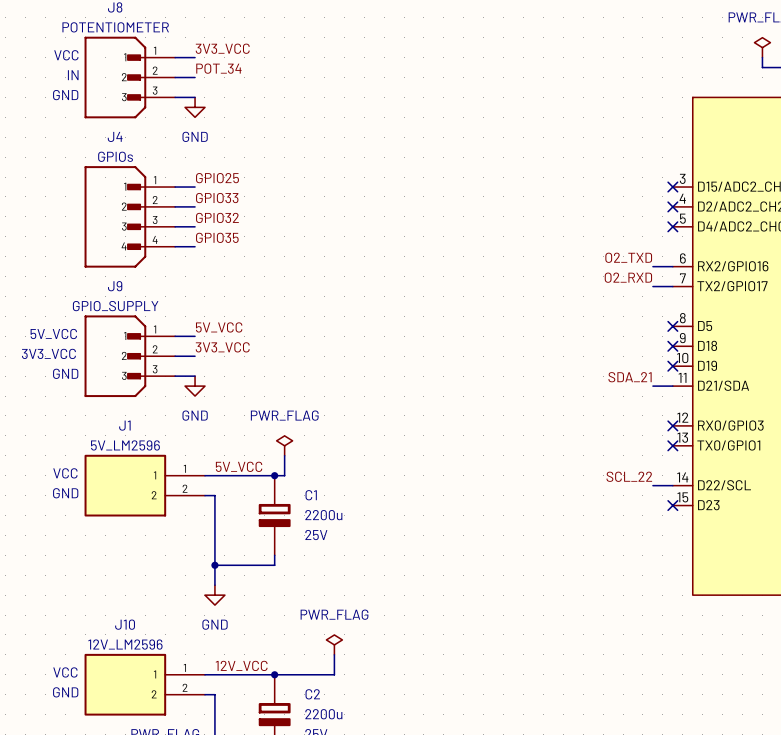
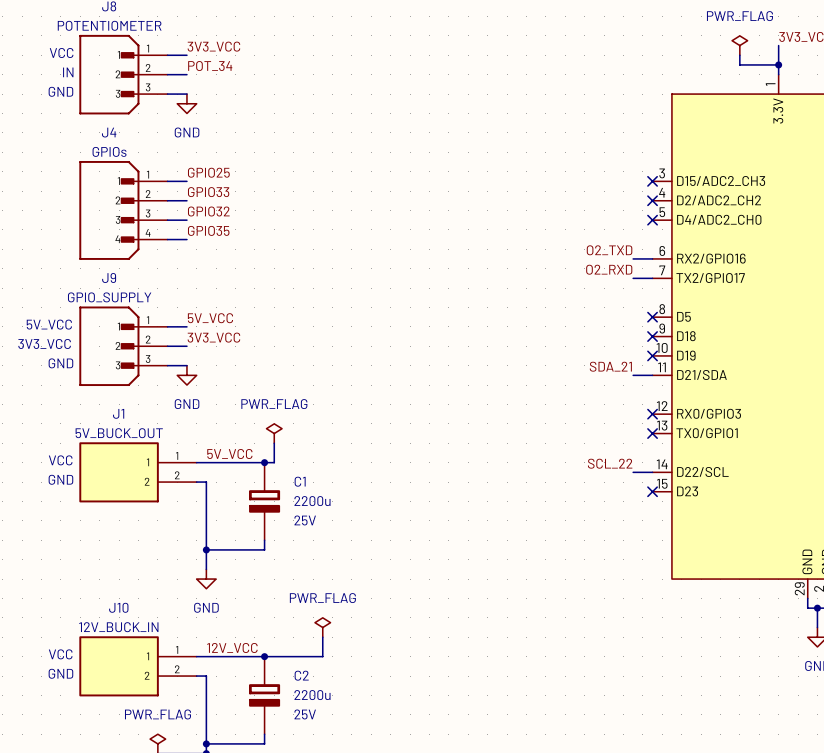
J1 value: 5V_LM2596 (125, 445) -> 5V_BUCK_OUT (119, 433)
J10 value: 12V_LM2596 (125, 644) -> 12V_BUCK_IN (118, 627)

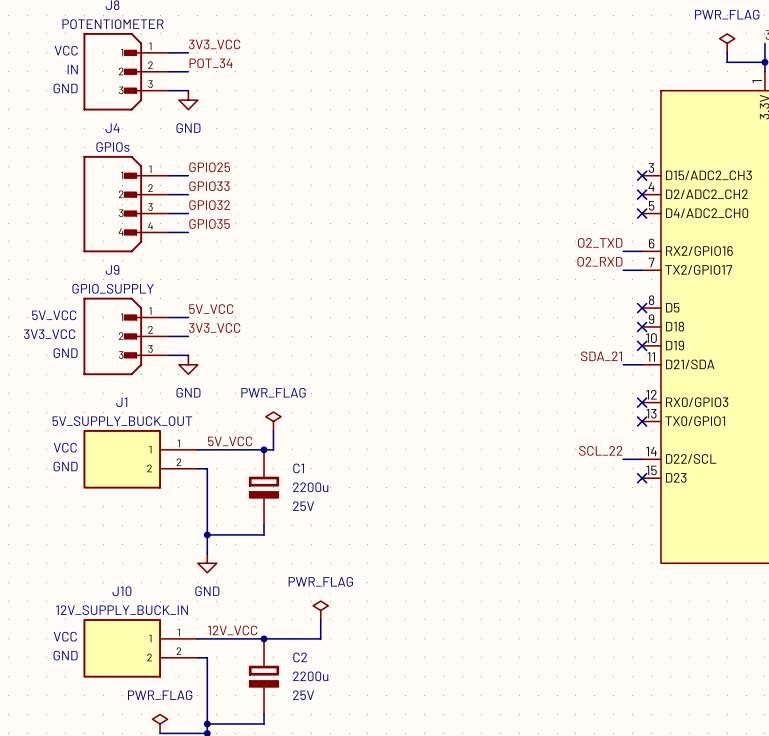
J1 value: 5V_BUCK_OUT (119, 433) -> 5V_SUPPLY_BUCK_OUT (122, 421)
J10 value: 12V_BUCK_IN (118, 627) -> 12V_SUPPLY_BUCK_IN (121, 610)

